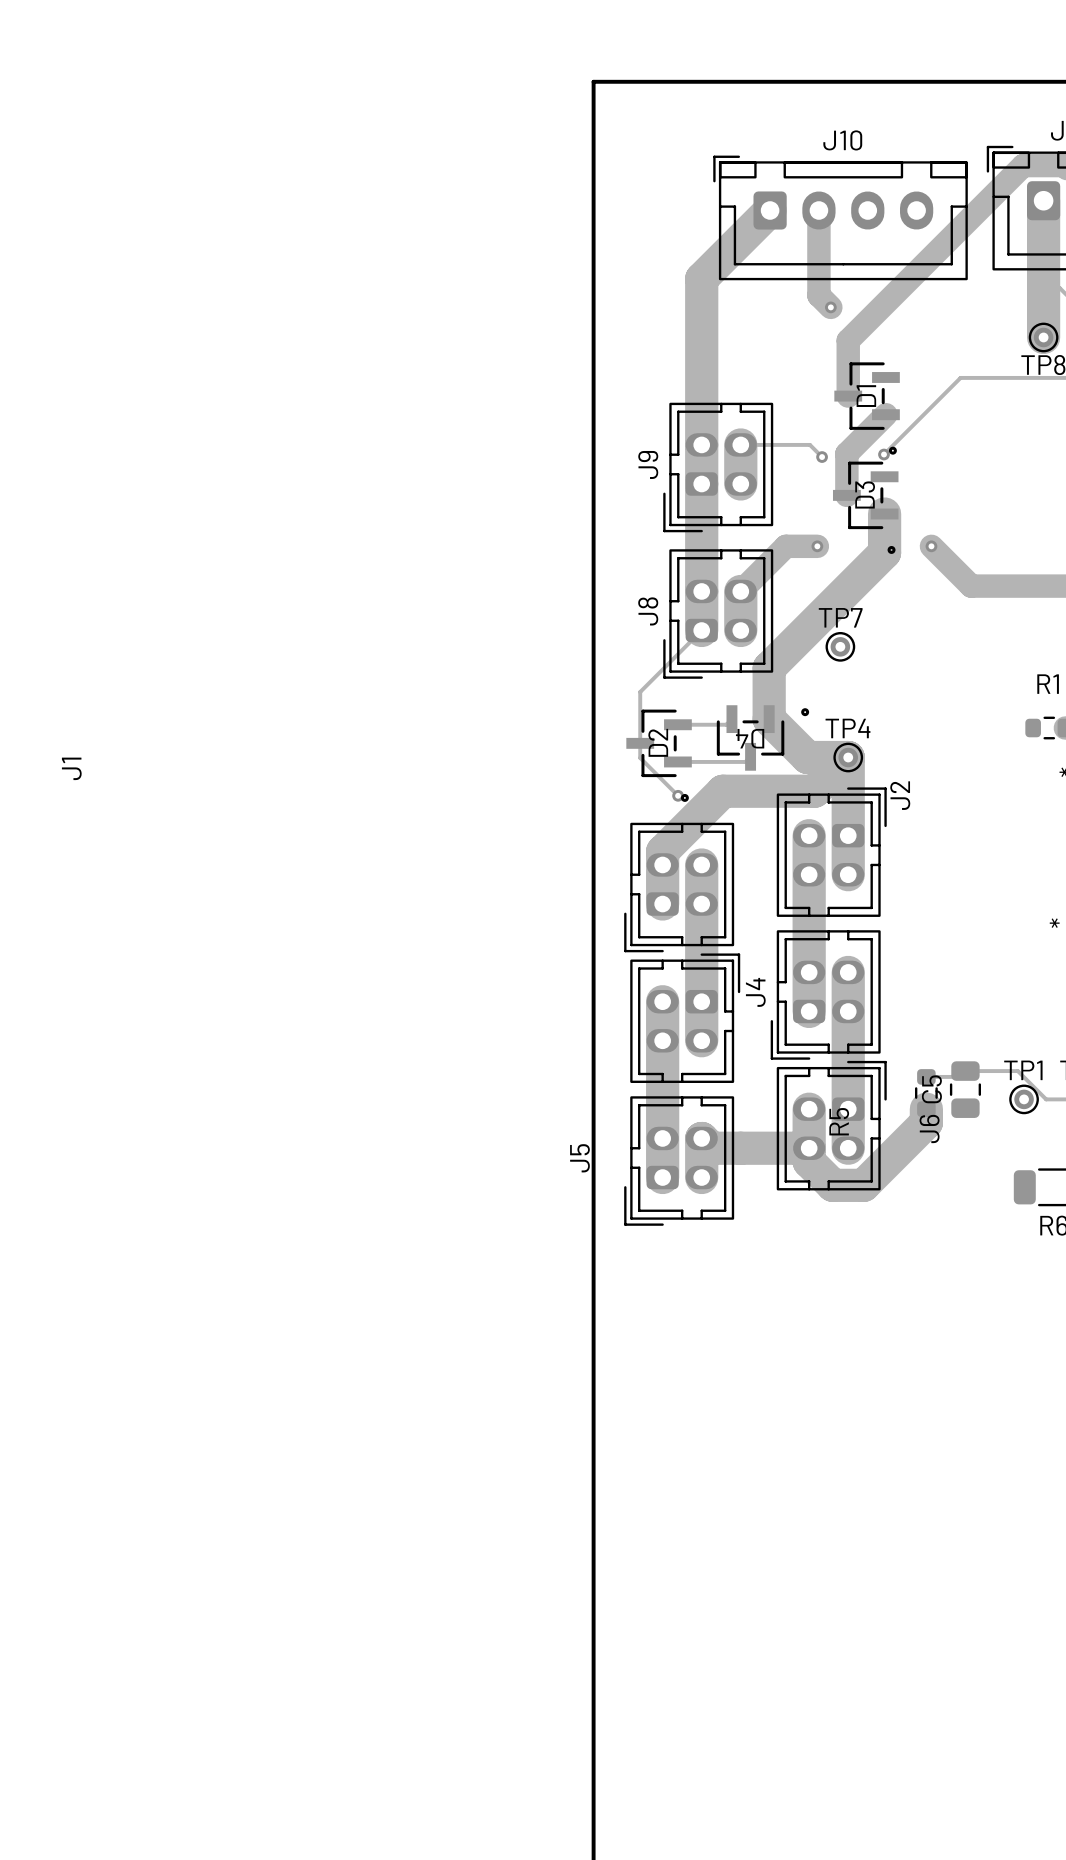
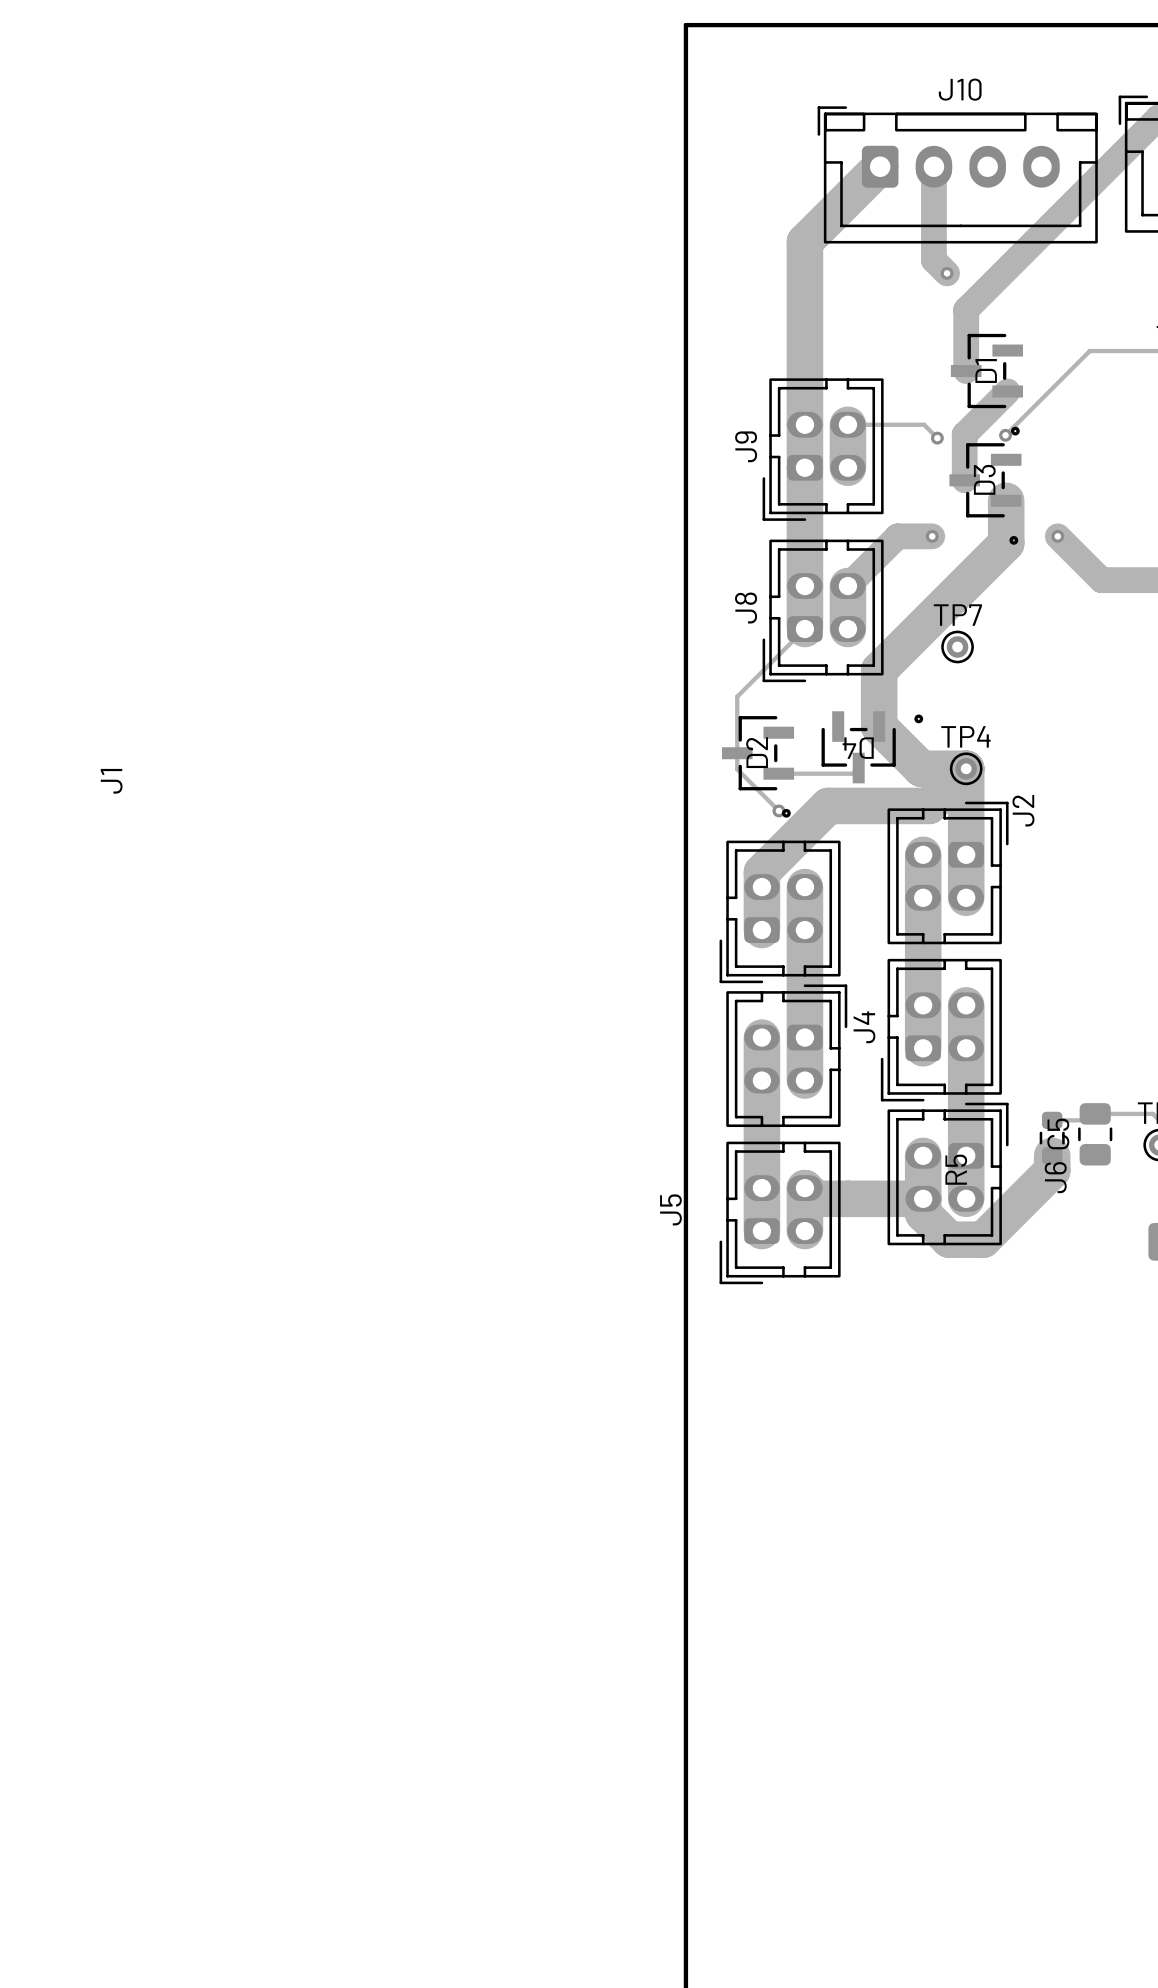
track: (731, 719) (726, 724) (677, 724) -> none

